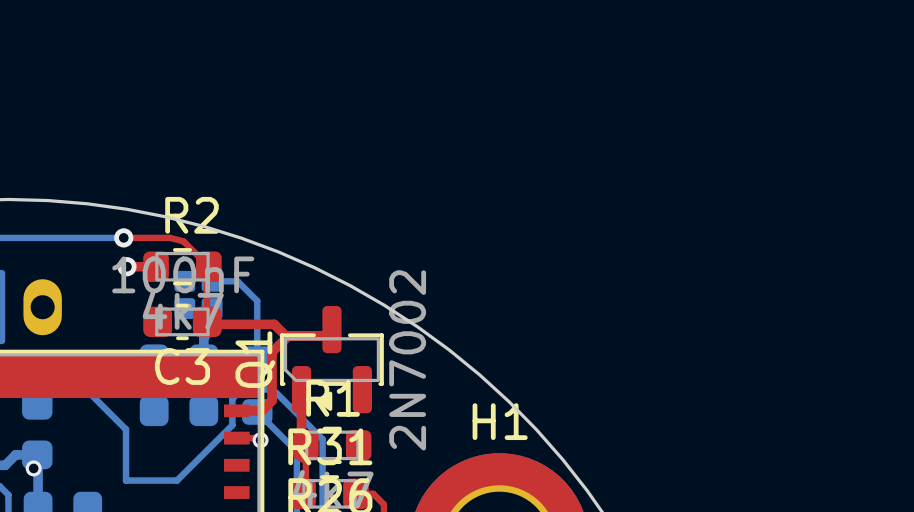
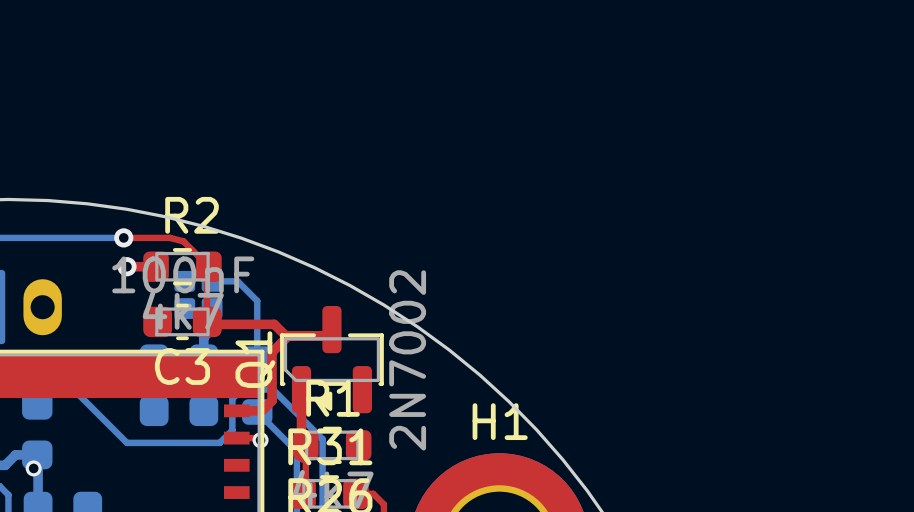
bottom track: (45, 361) (58, 361) (126, 429) (126, 480) (177, 480) (232, 425) -> (45, 361) (126, 442) (219, 442) (232, 430) (232, 425)

